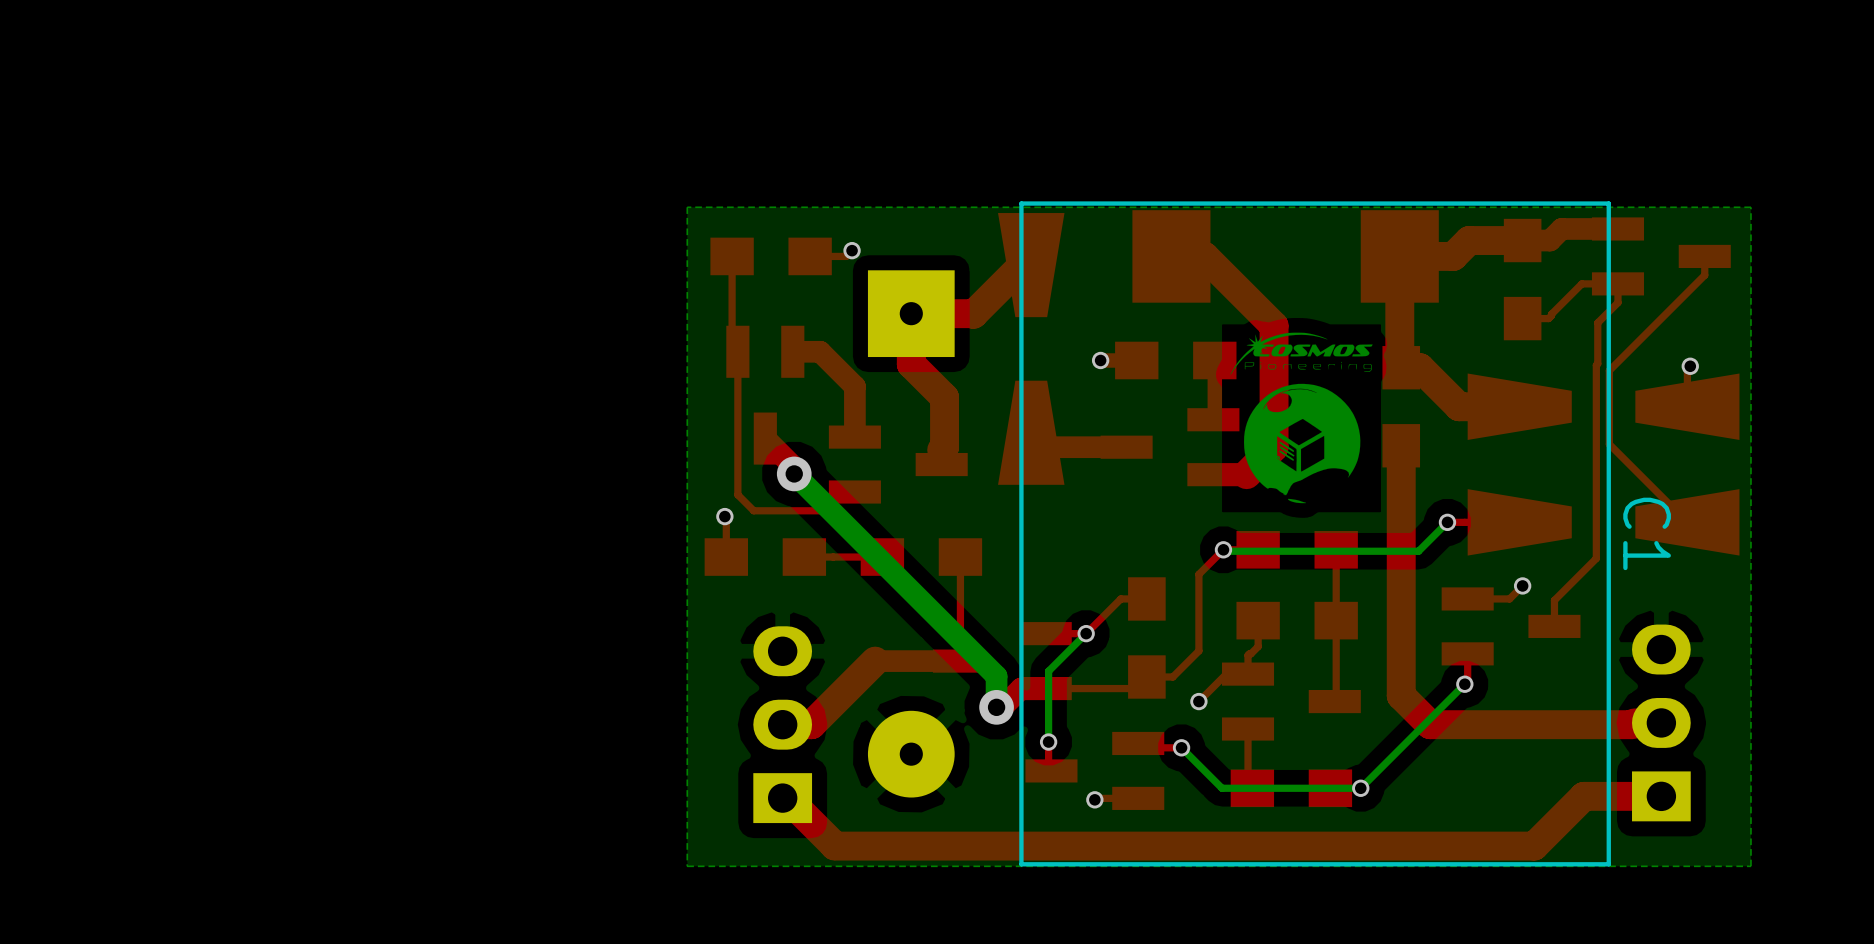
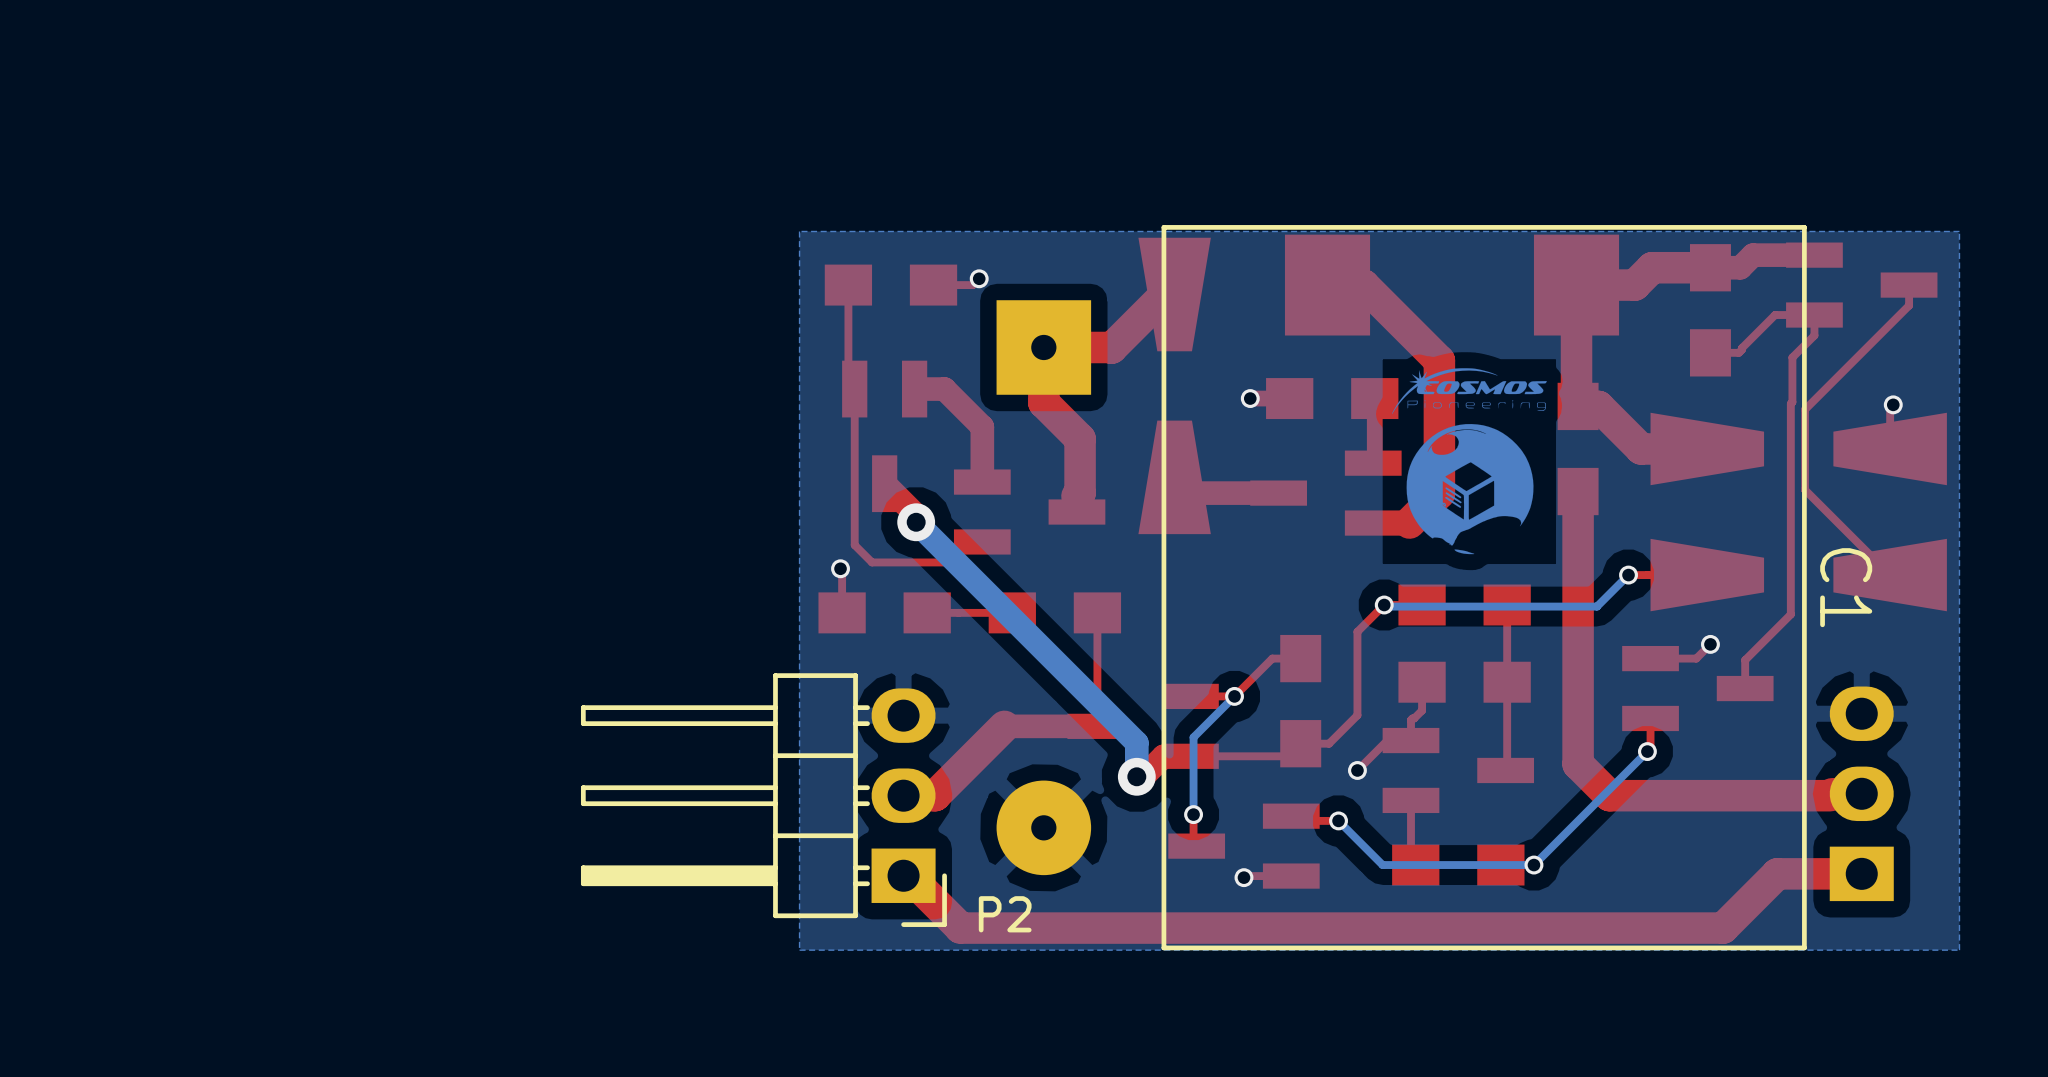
part: (782, 724) -> none
P2: none -> (763, 800)

